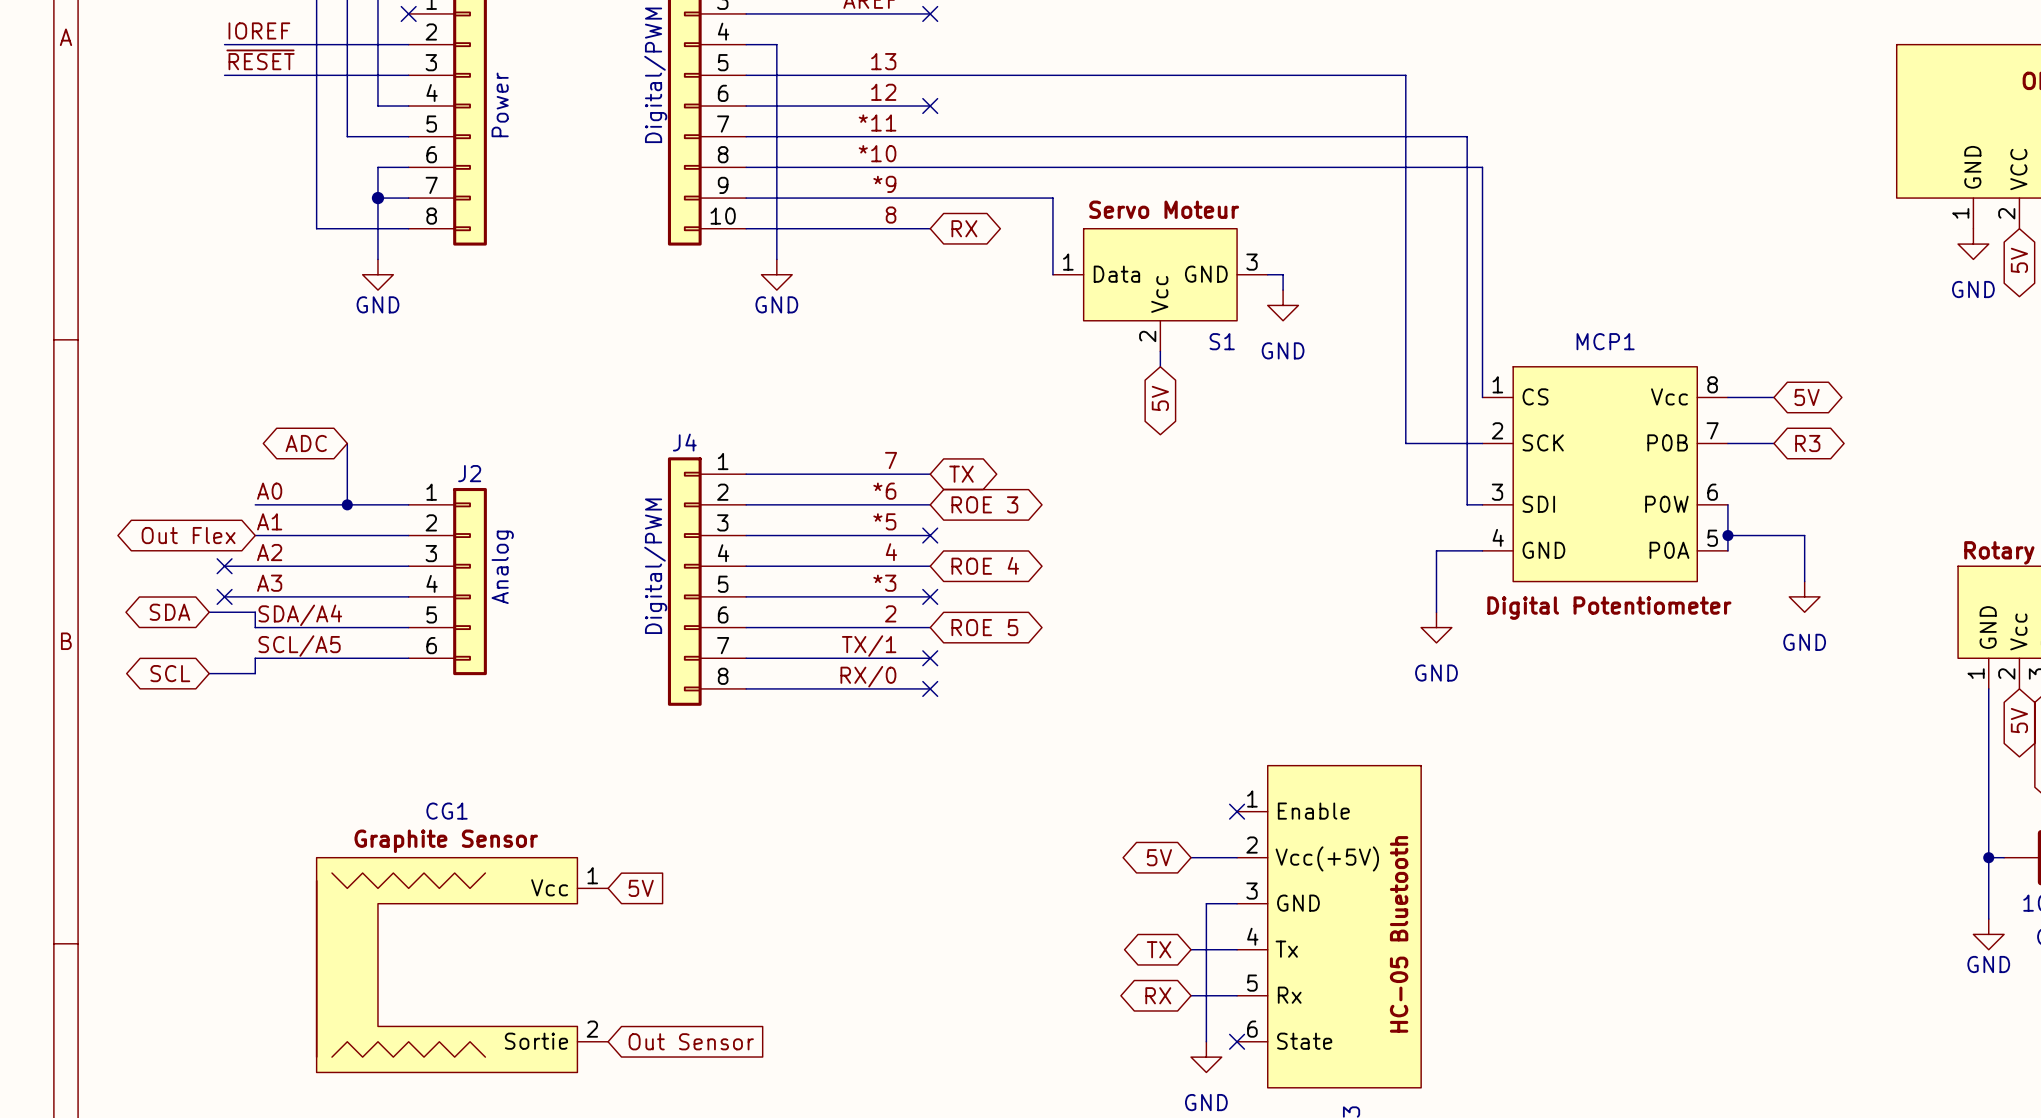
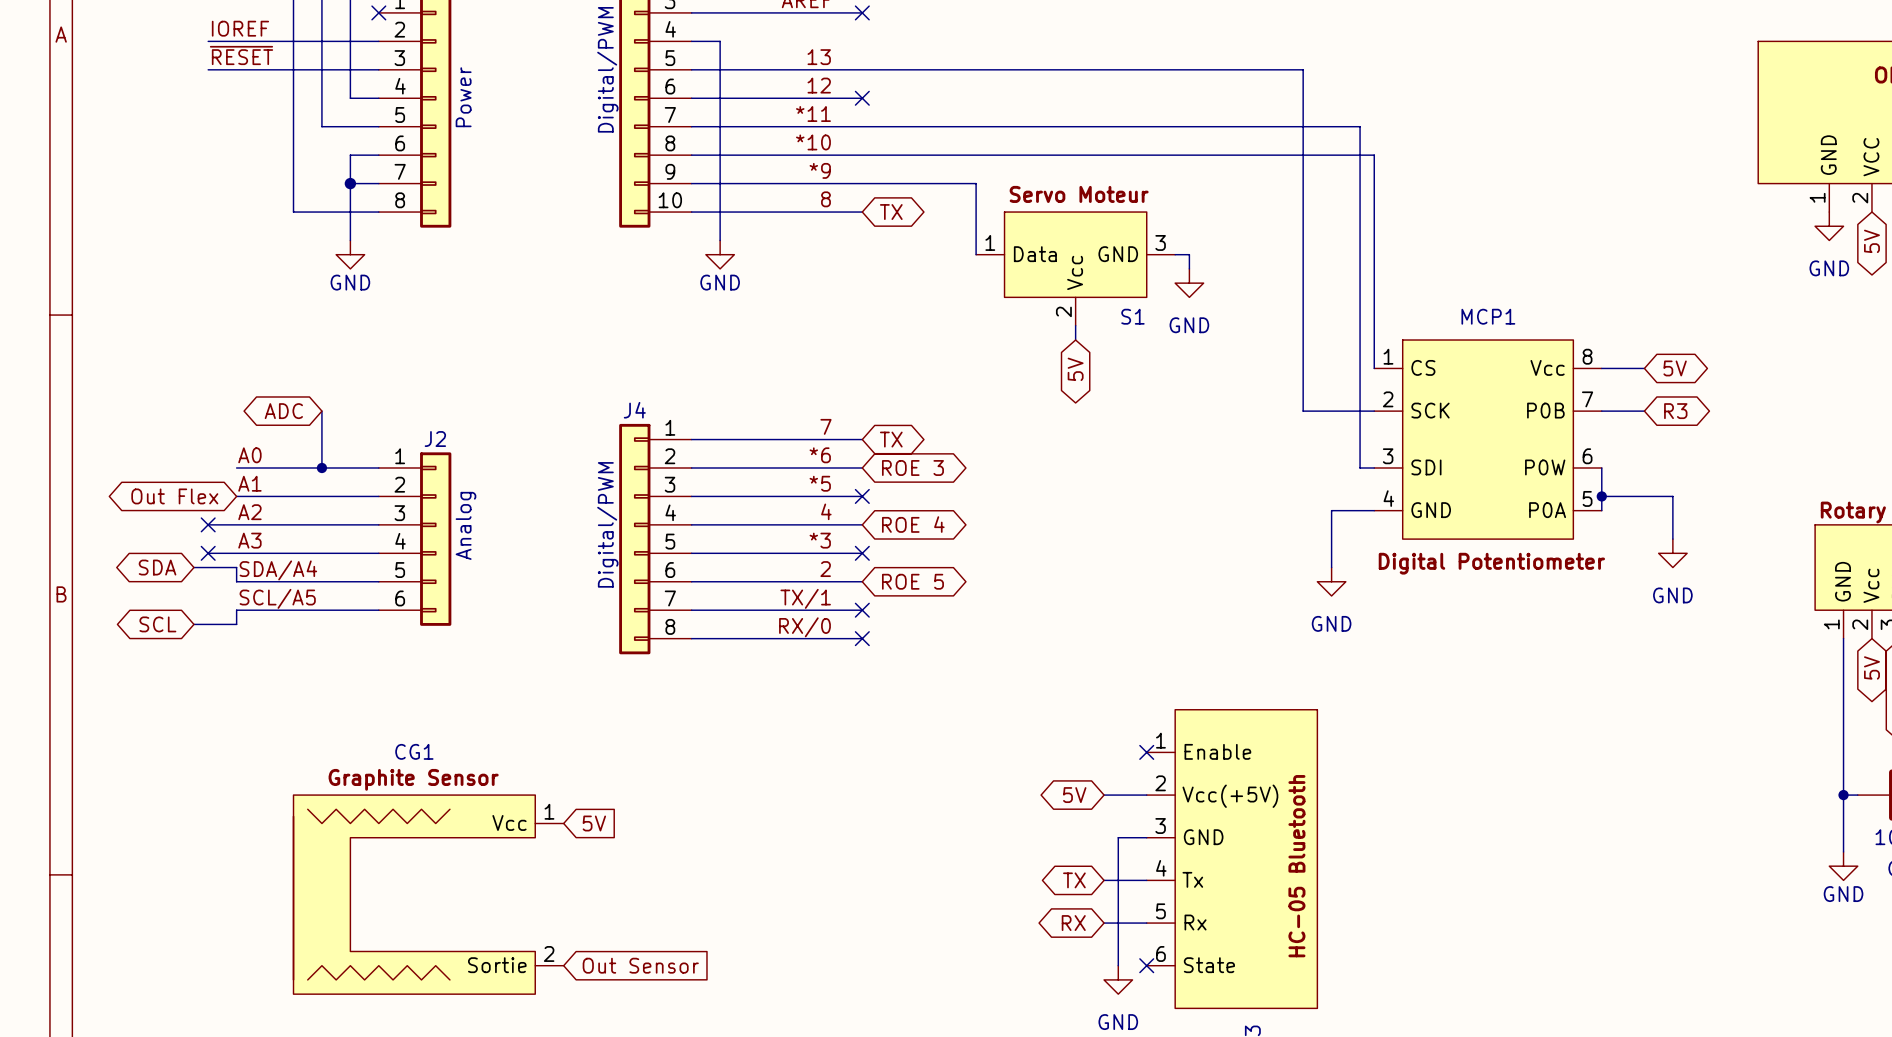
global label: RX (964, 228) -> TX (891, 212)

